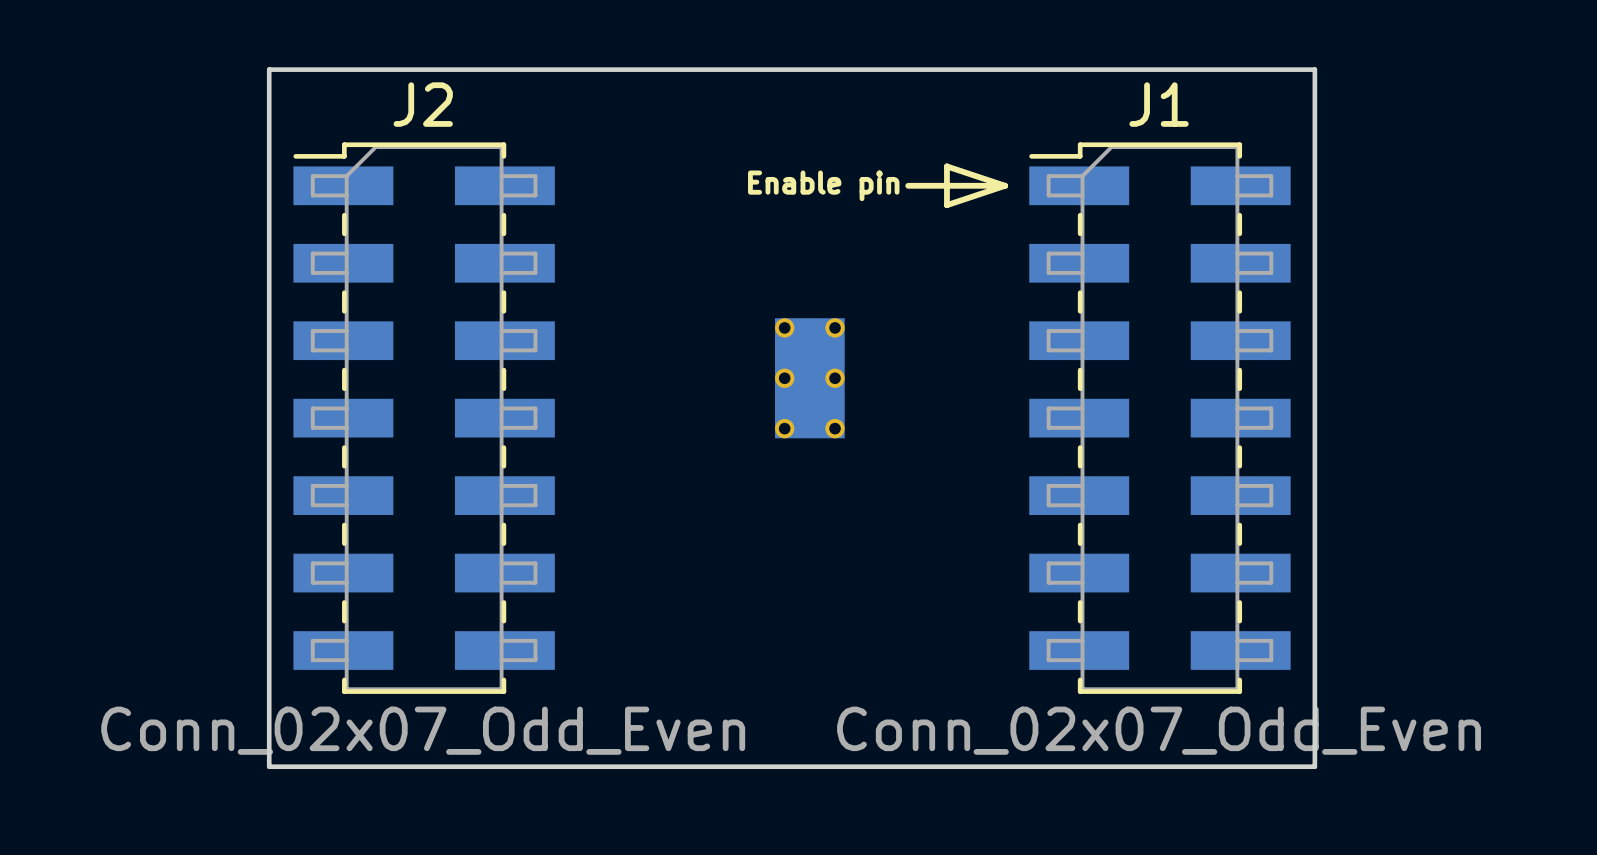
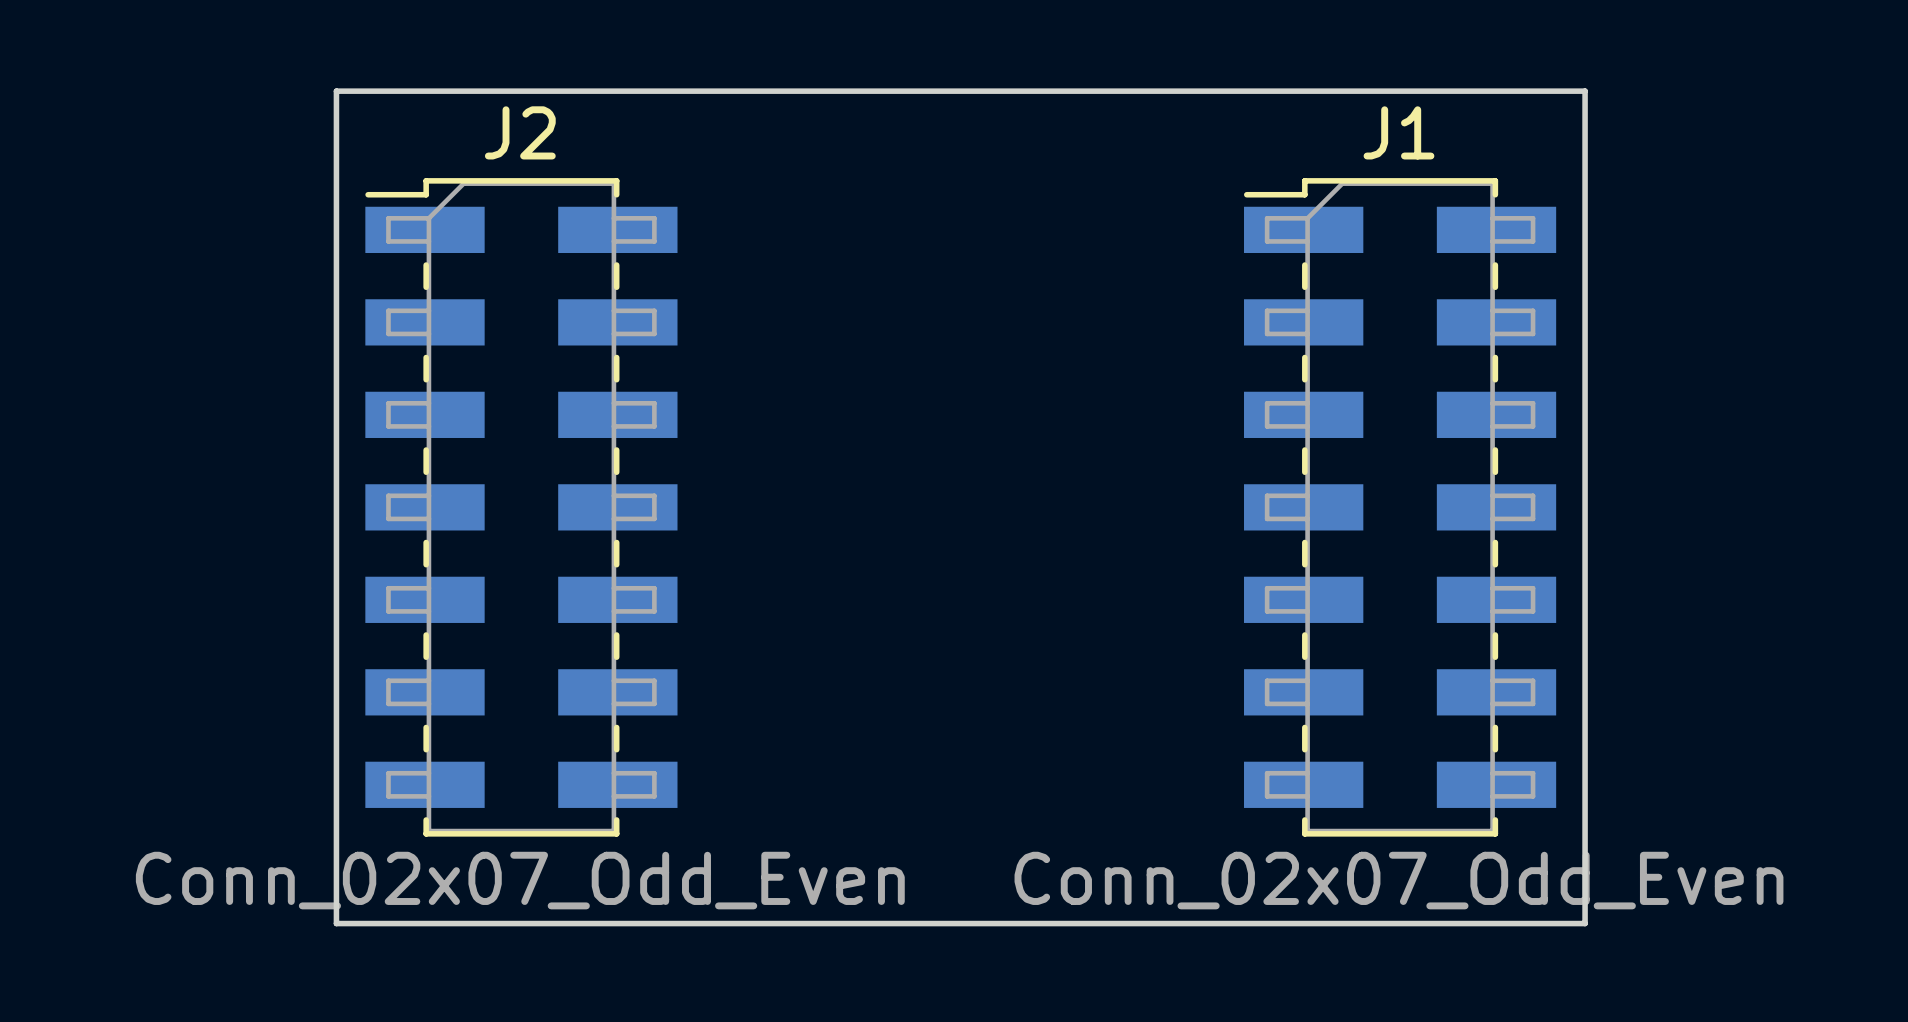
text: Enable pin (823, 185) -> none
line: (1005, 185) (908, 185) -> none
line: (1005, 185) (946, 166) (946, 205) (1005, 185) -> none
part: (809, 378) -> none

